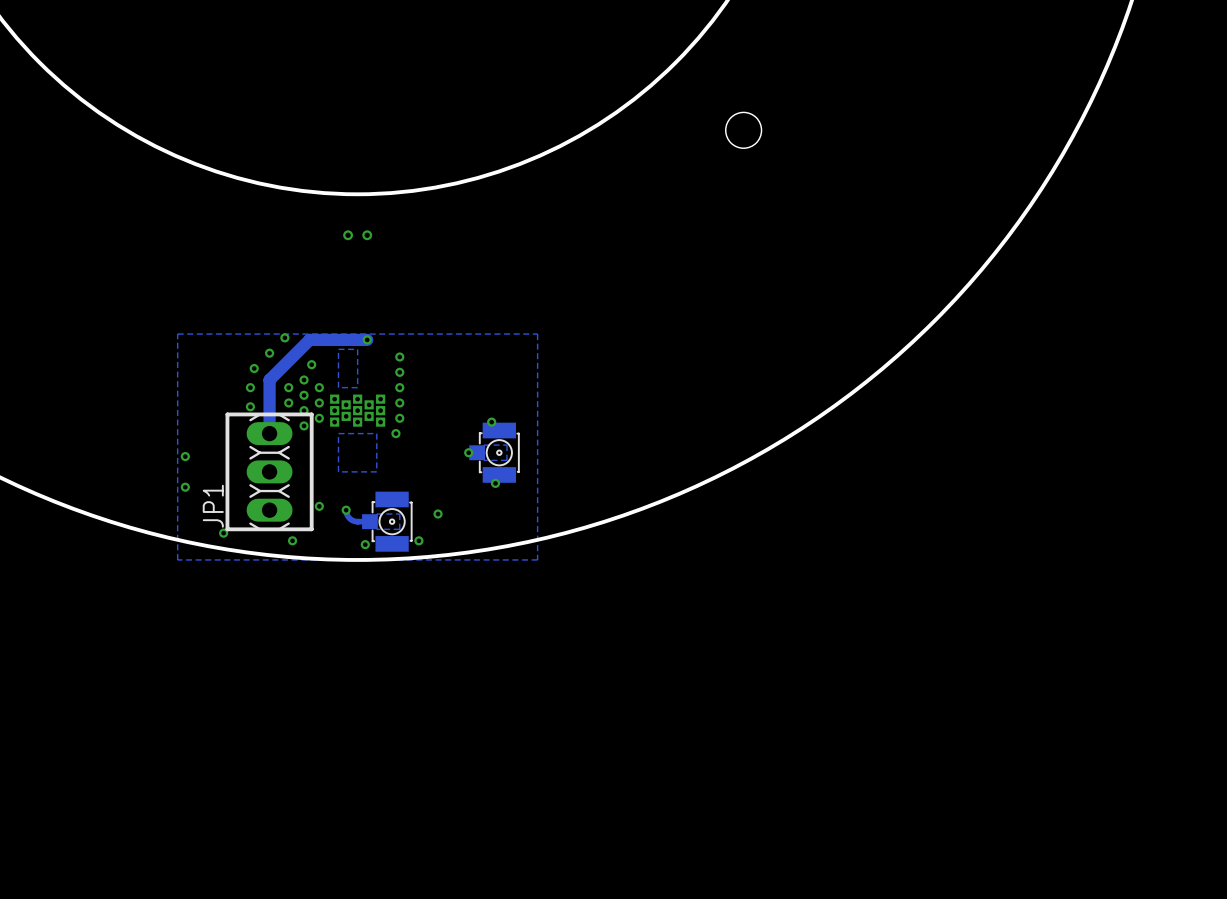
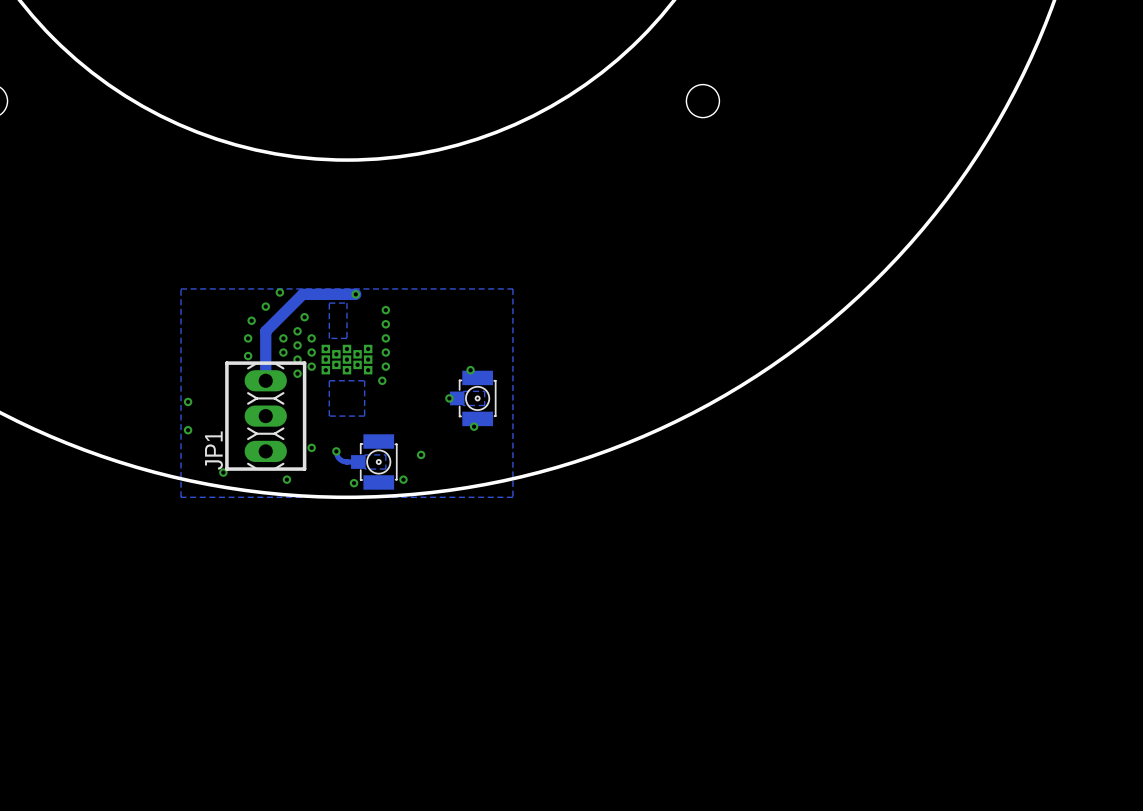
via: (348, 235) -> none
via: (367, 235) -> none

